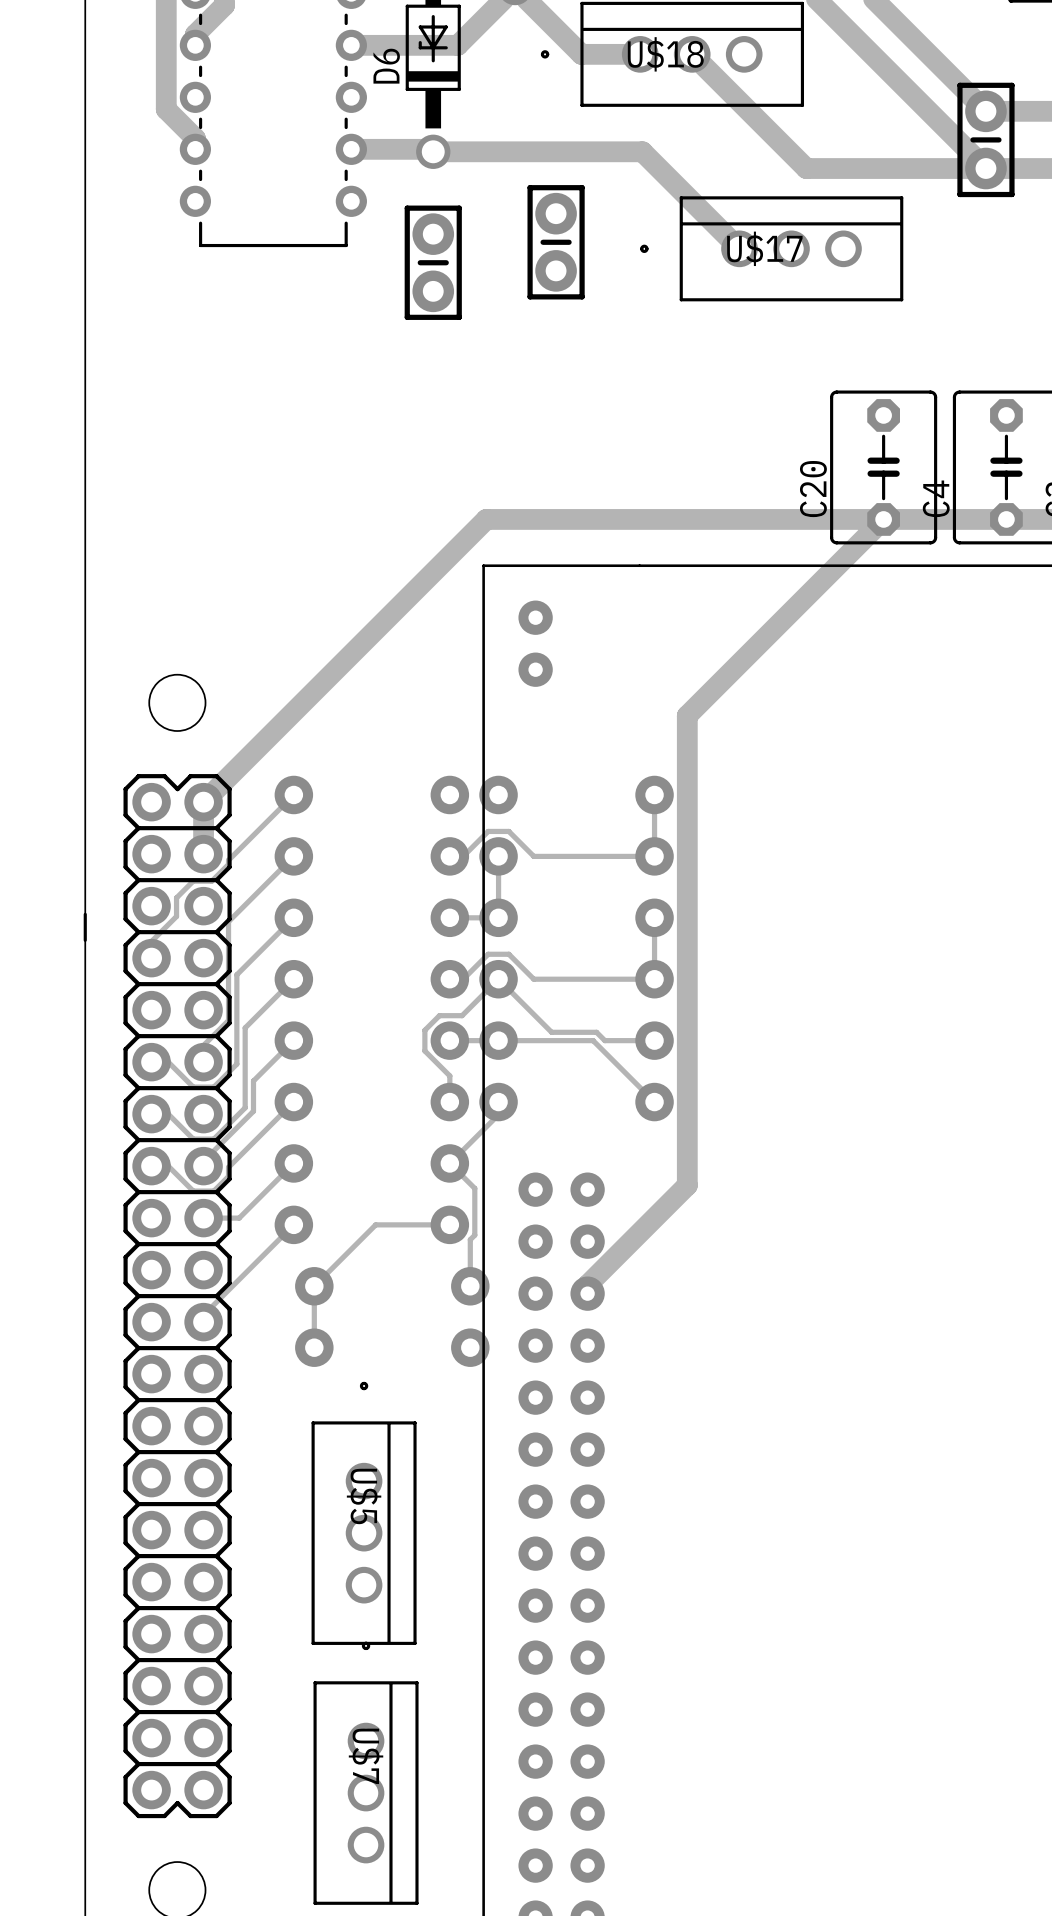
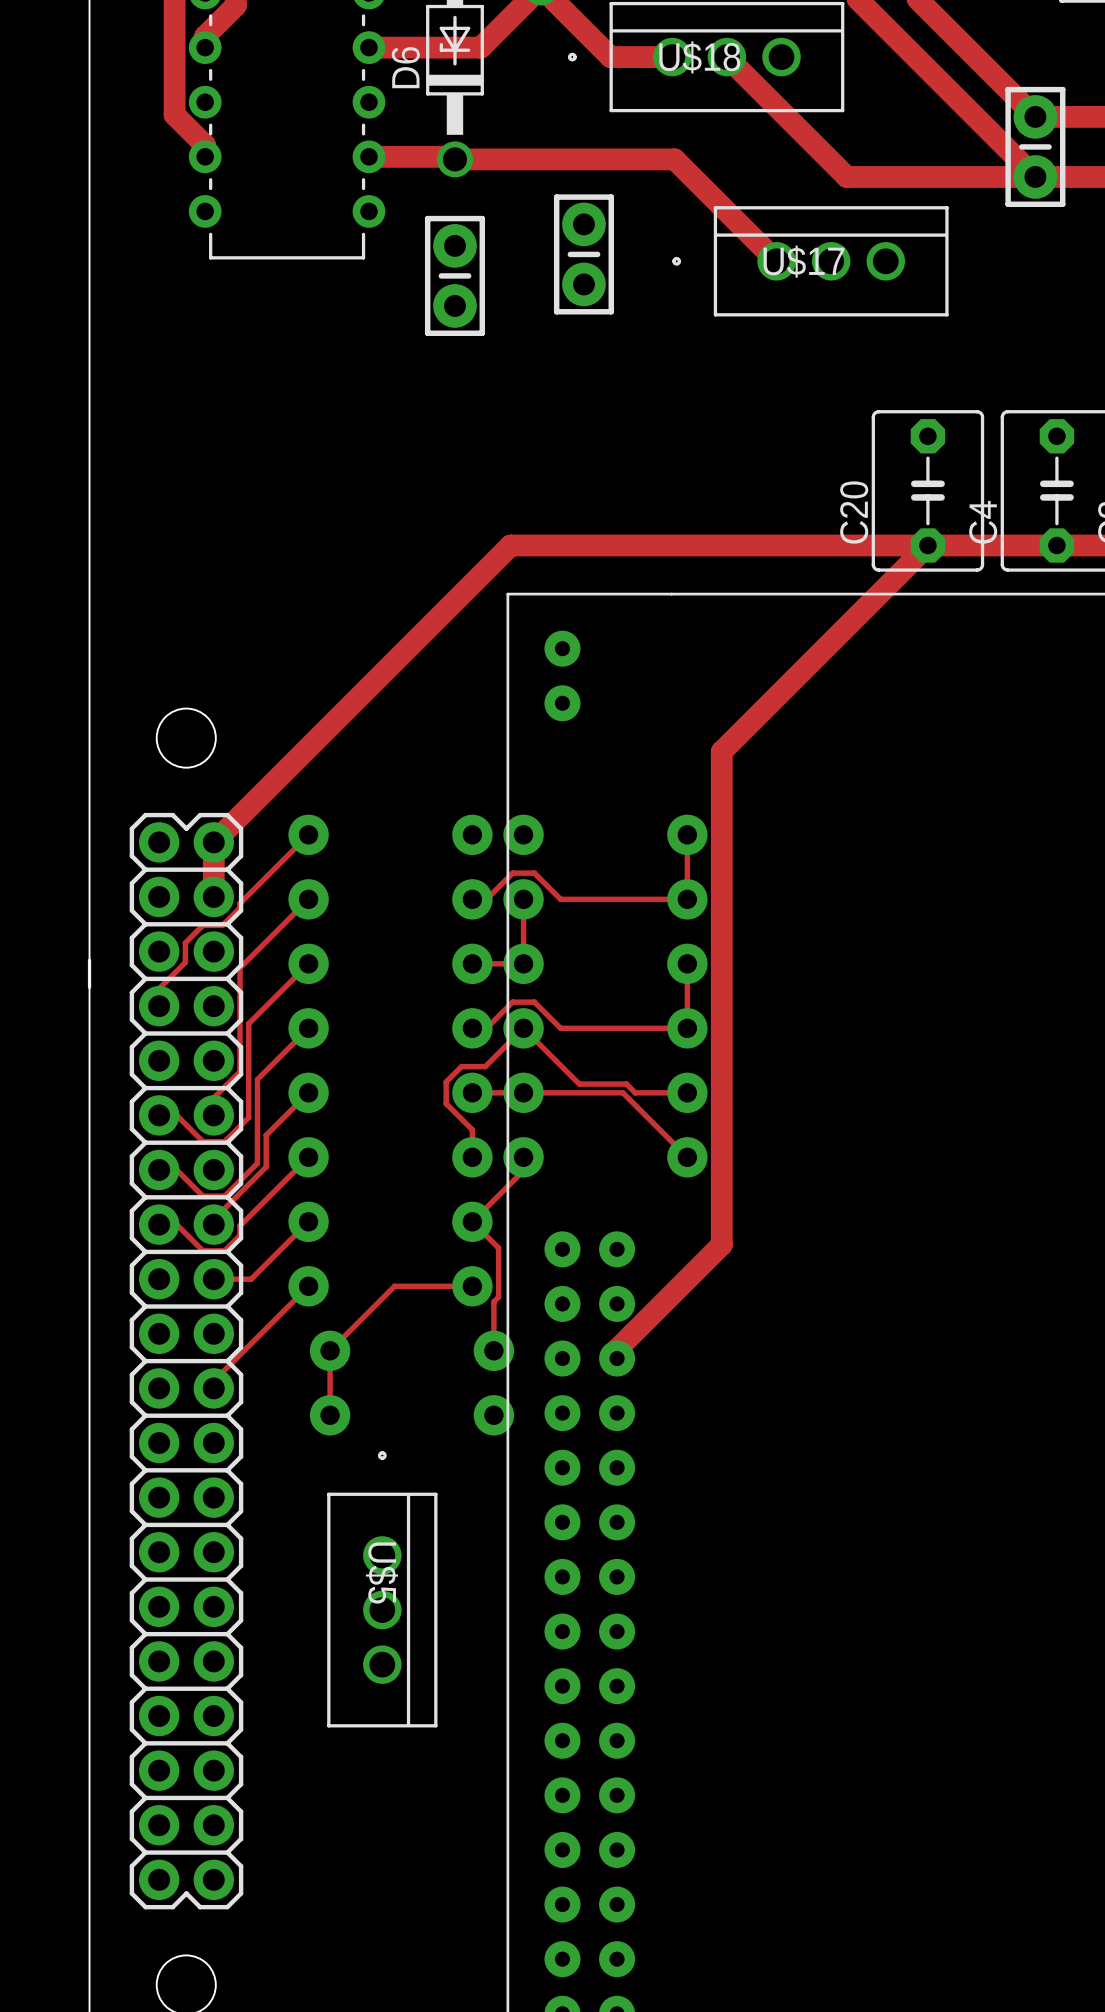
U$7: (366, 1773) -> none

